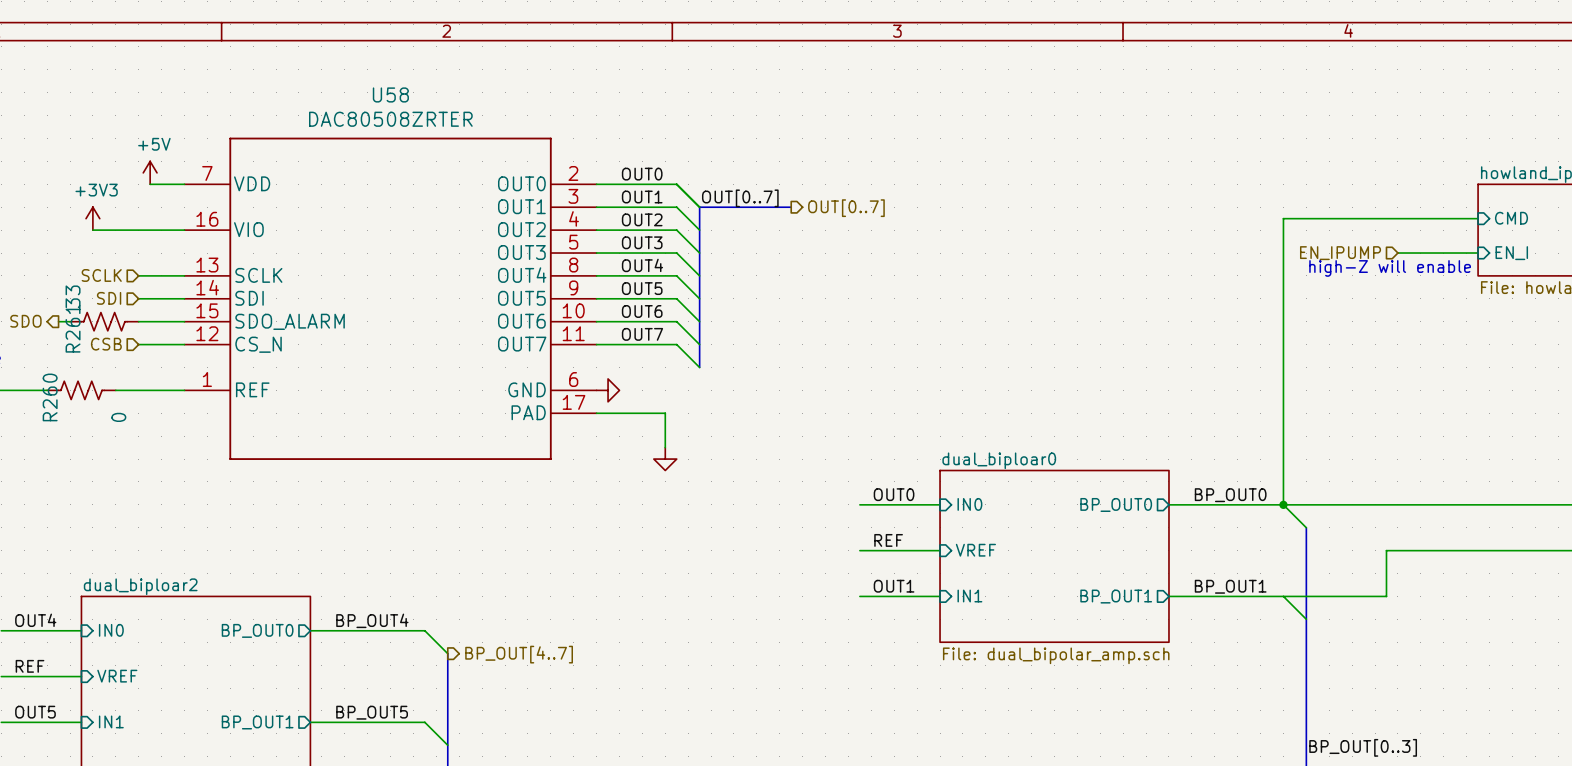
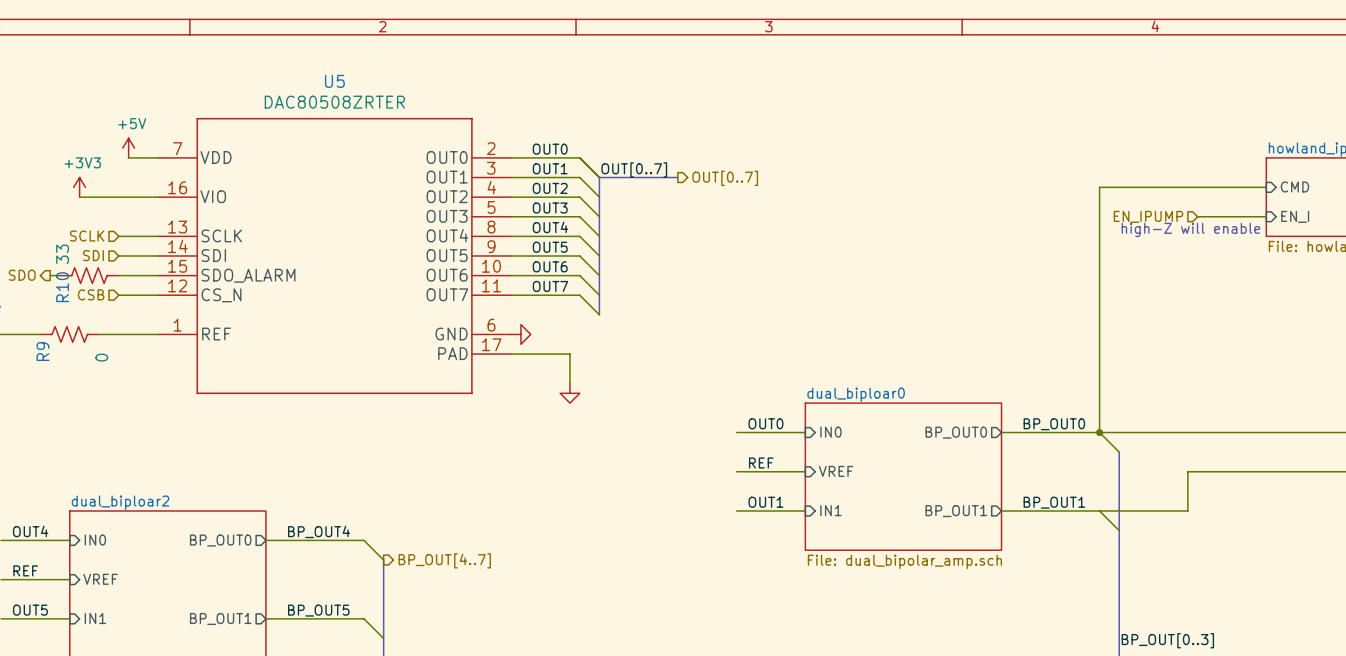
U58 name: U58 (390, 94) -> U5 (334, 81)
R261 name: R261 (73, 328) -> R10 (62, 287)
R260 name: R260 (50, 397) -> R9 (42, 351)

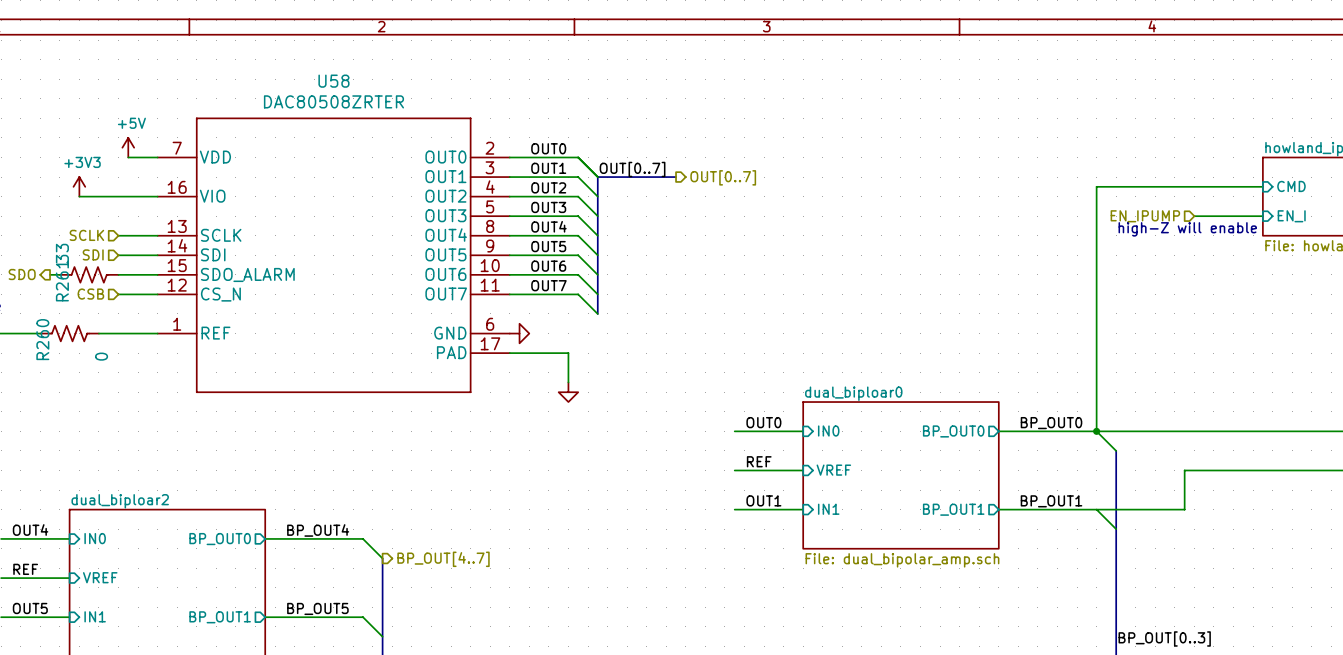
U5 name: U5 (334, 81) -> U58 (333, 81)
R10 name: R10 (62, 287) -> R261 (62, 280)
R9 name: R9 (42, 351) -> R260 (42, 339)

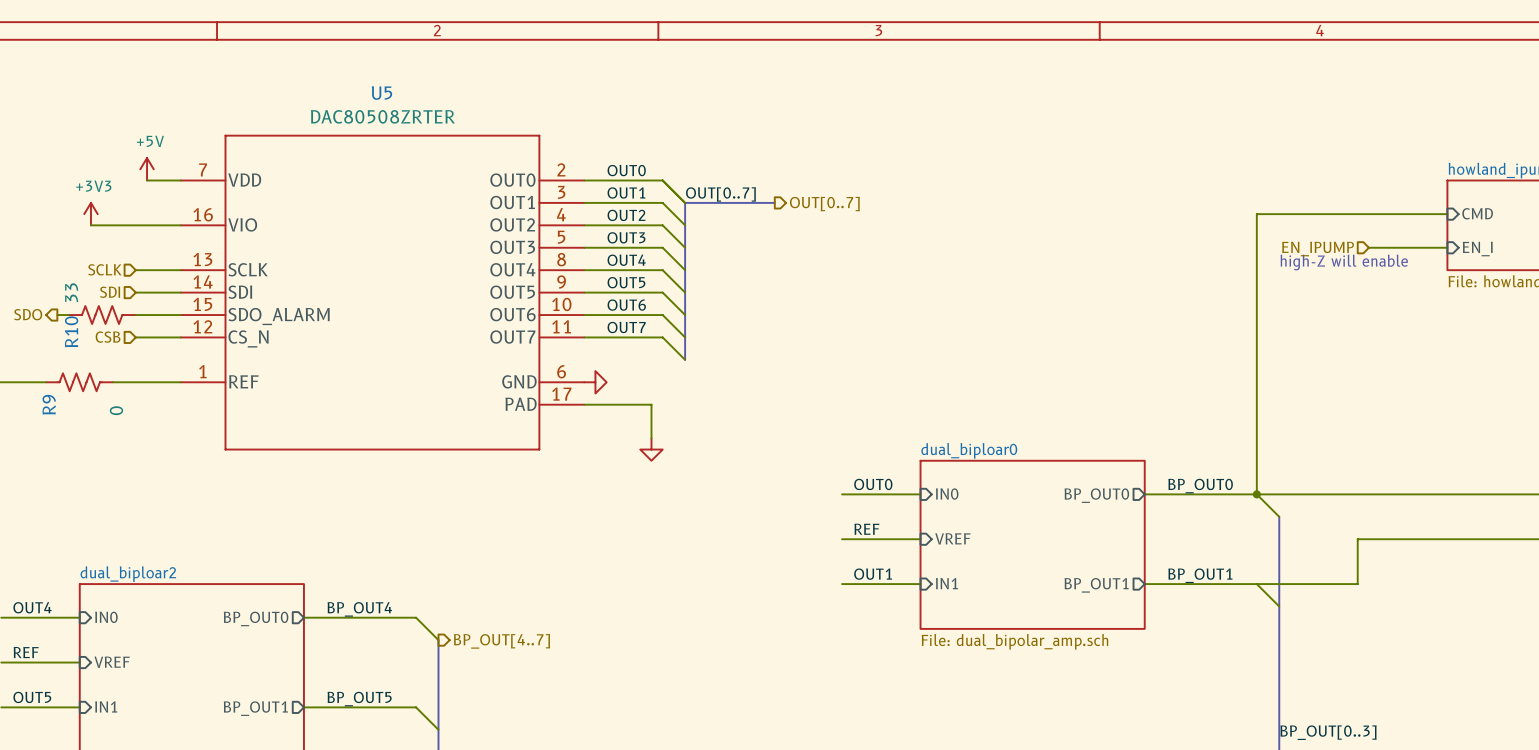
U58 name: U58 (333, 81) -> U5 (381, 93)
R261 name: R261 (62, 280) -> R10 (71, 331)
R260 name: R260 (42, 339) -> R9 (49, 404)

